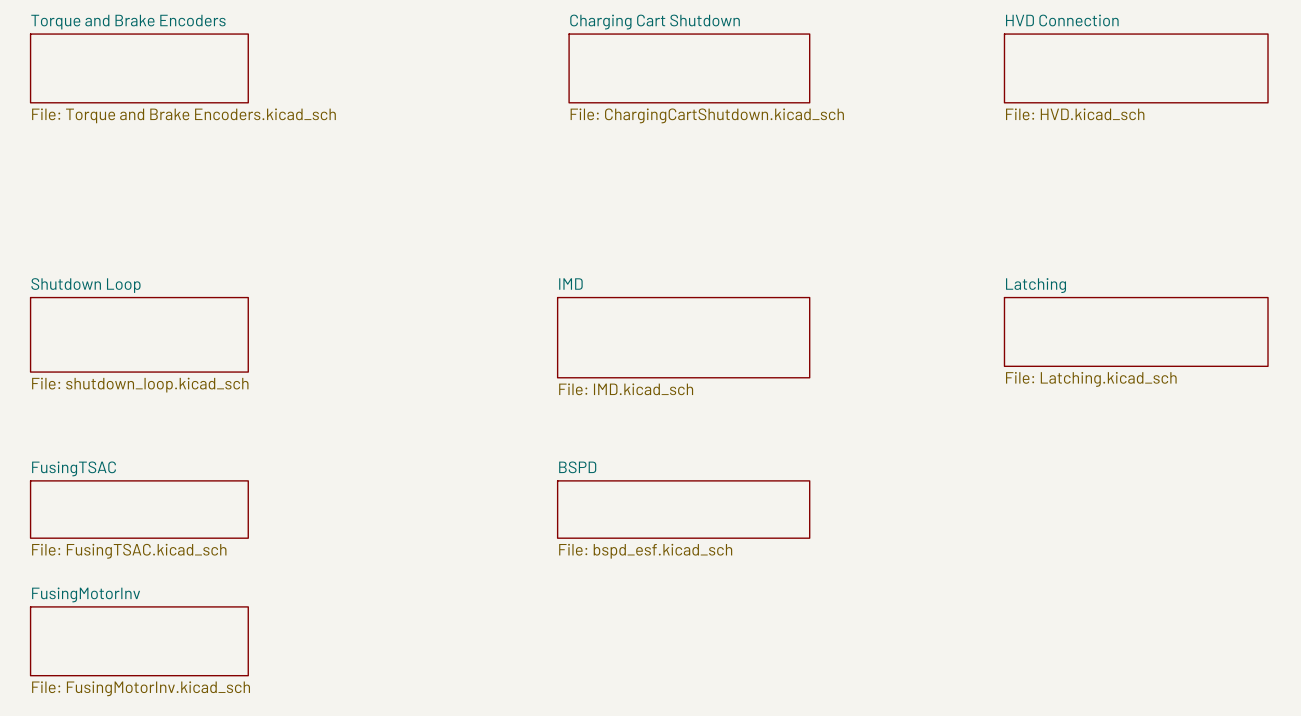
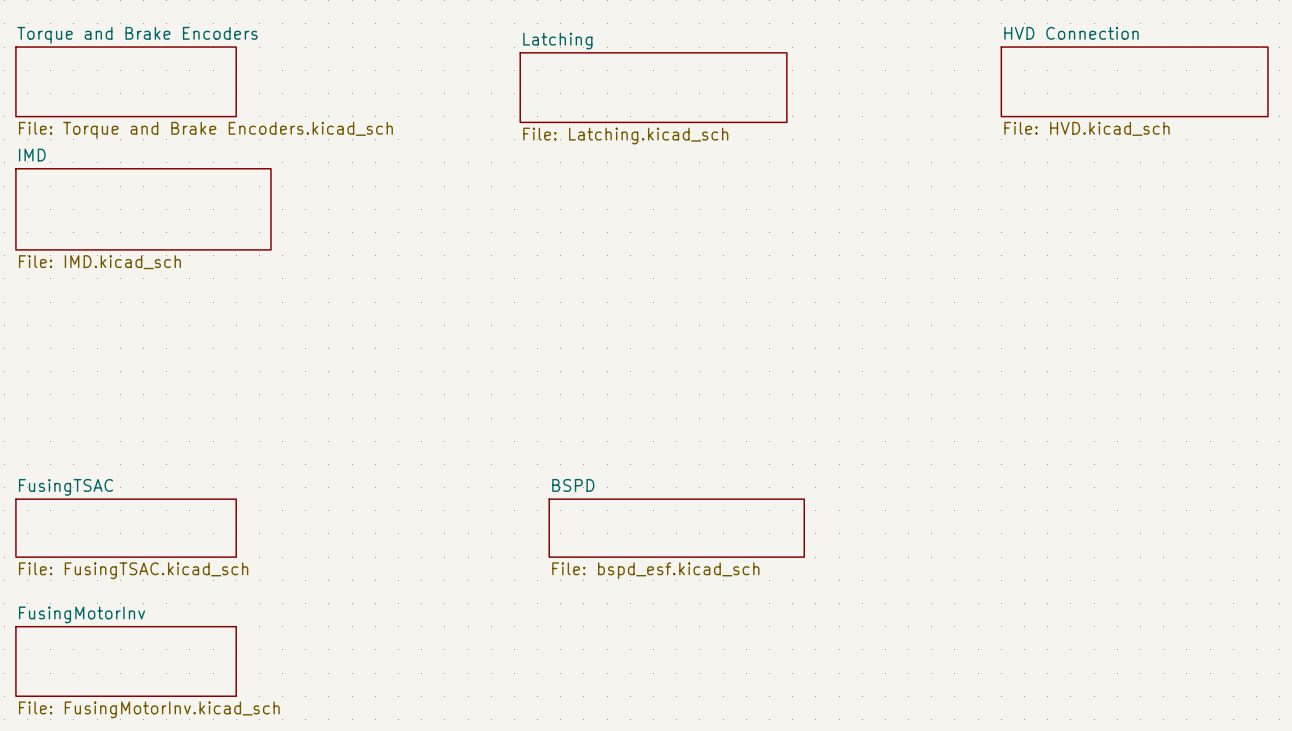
sheet Charging Cart Shutdown: File: ChargingCartShutdown.kicad_sch (689, 68) -> none
sheet Latching: none -> File: Latching.kicad_sch (653, 87)
sheet IMD: none -> File: IMD.kicad_sch (143, 209)
sheet Latching: File: Latching.kicad_sch (1136, 331) -> none
sheet Shutdown Loop: File: shutdown_loop.kicad_sch (139, 334) -> none
sheet IMD: File: IMD.kicad_sch (683, 337) -> none

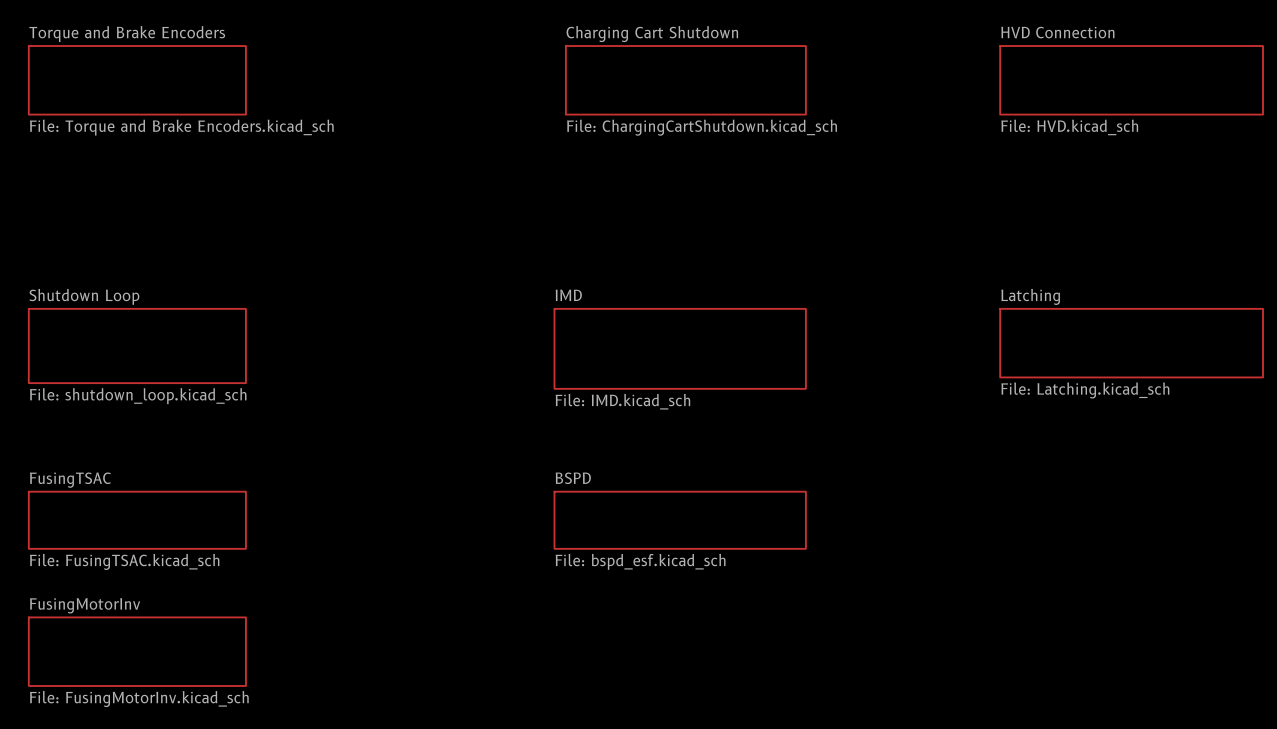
sheet Charging Cart Shutdown: none -> File: ChargingCartShutdown.kicad_sch (685, 80)
sheet Latching: File: Latching.kicad_sch (653, 87) -> none
sheet IMD: File: IMD.kicad_sch (143, 209) -> none
sheet Latching: none -> File: Latching.kicad_sch (1131, 343)
sheet Shutdown Loop: none -> File: shutdown_loop.kicad_sch (137, 346)
sheet IMD: none -> File: IMD.kicad_sch (680, 348)

